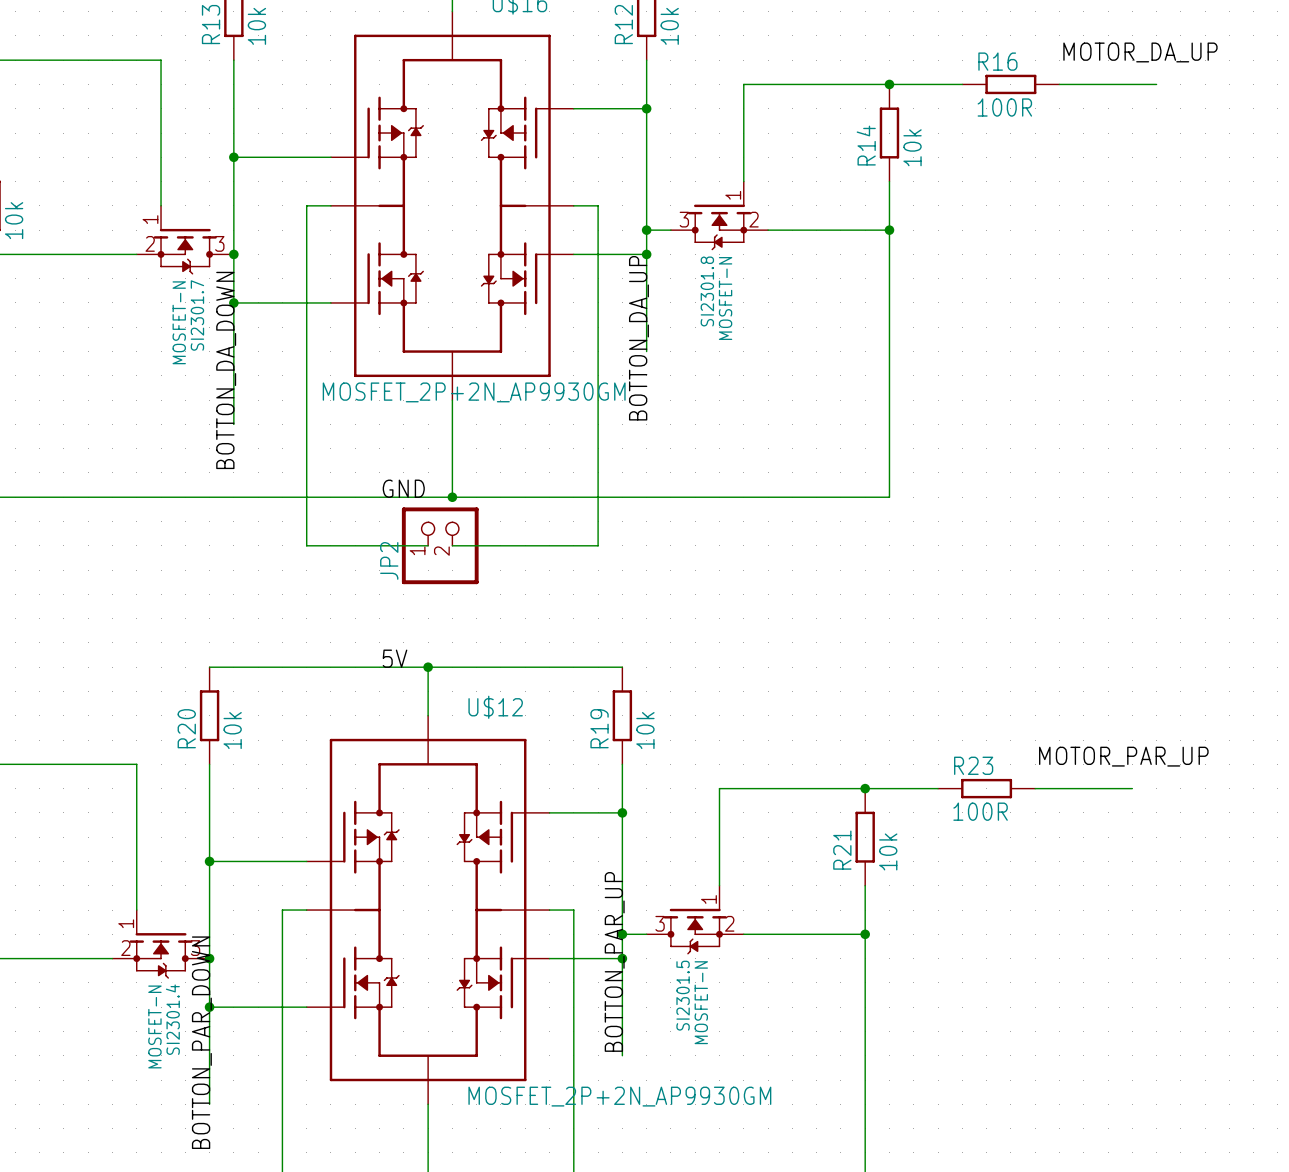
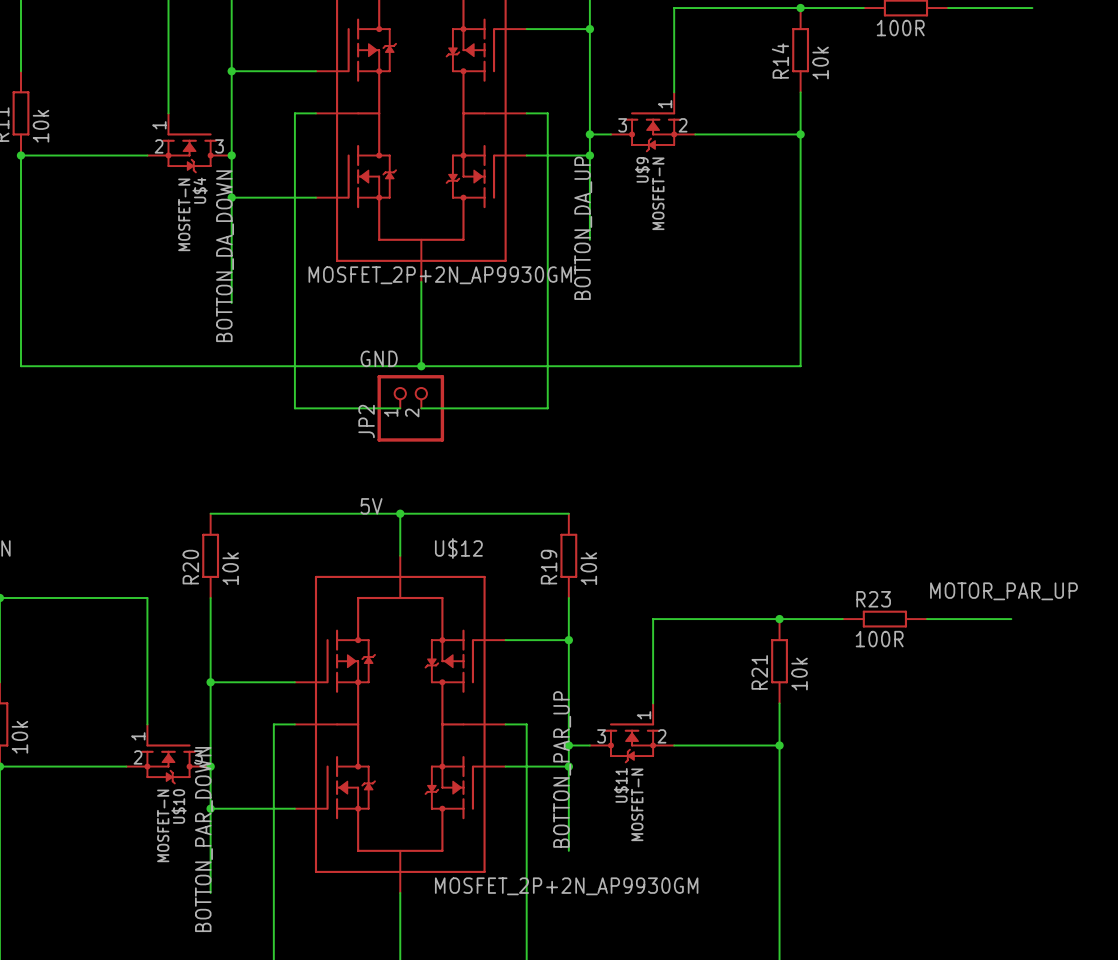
SI2301.8 name: SI2301.8 (707, 291) -> U$9 (642, 169)
SI2301.7 name: SI2301.7 (197, 315) -> U$4 (200, 190)
SI2301.5 name: SI2301.5 (683, 995) -> U$11 (621, 785)
SI2301.4 name: SI2301.4 (172, 1019) -> U$10 (179, 806)

